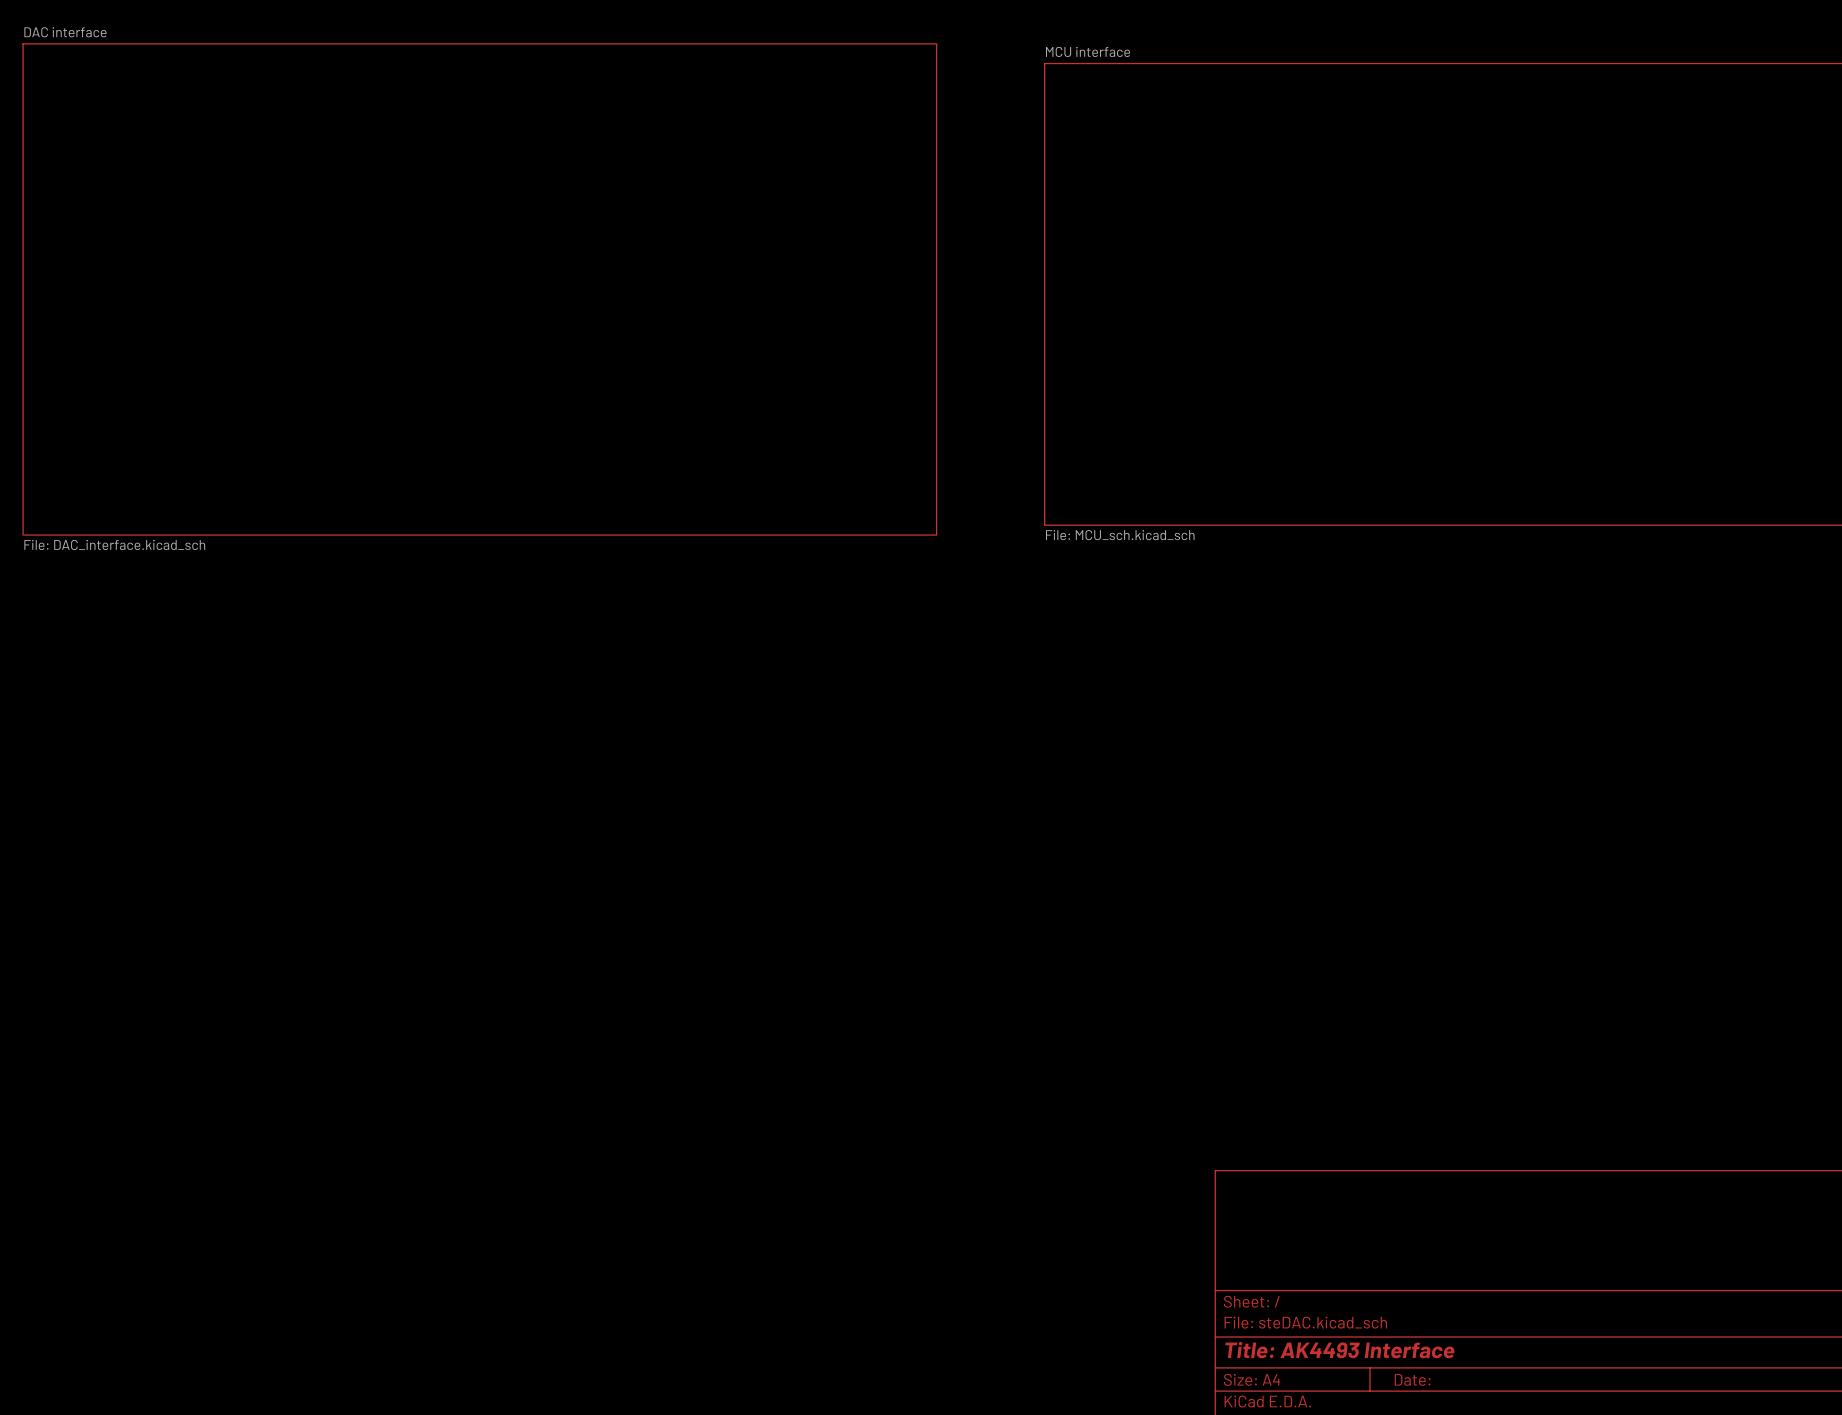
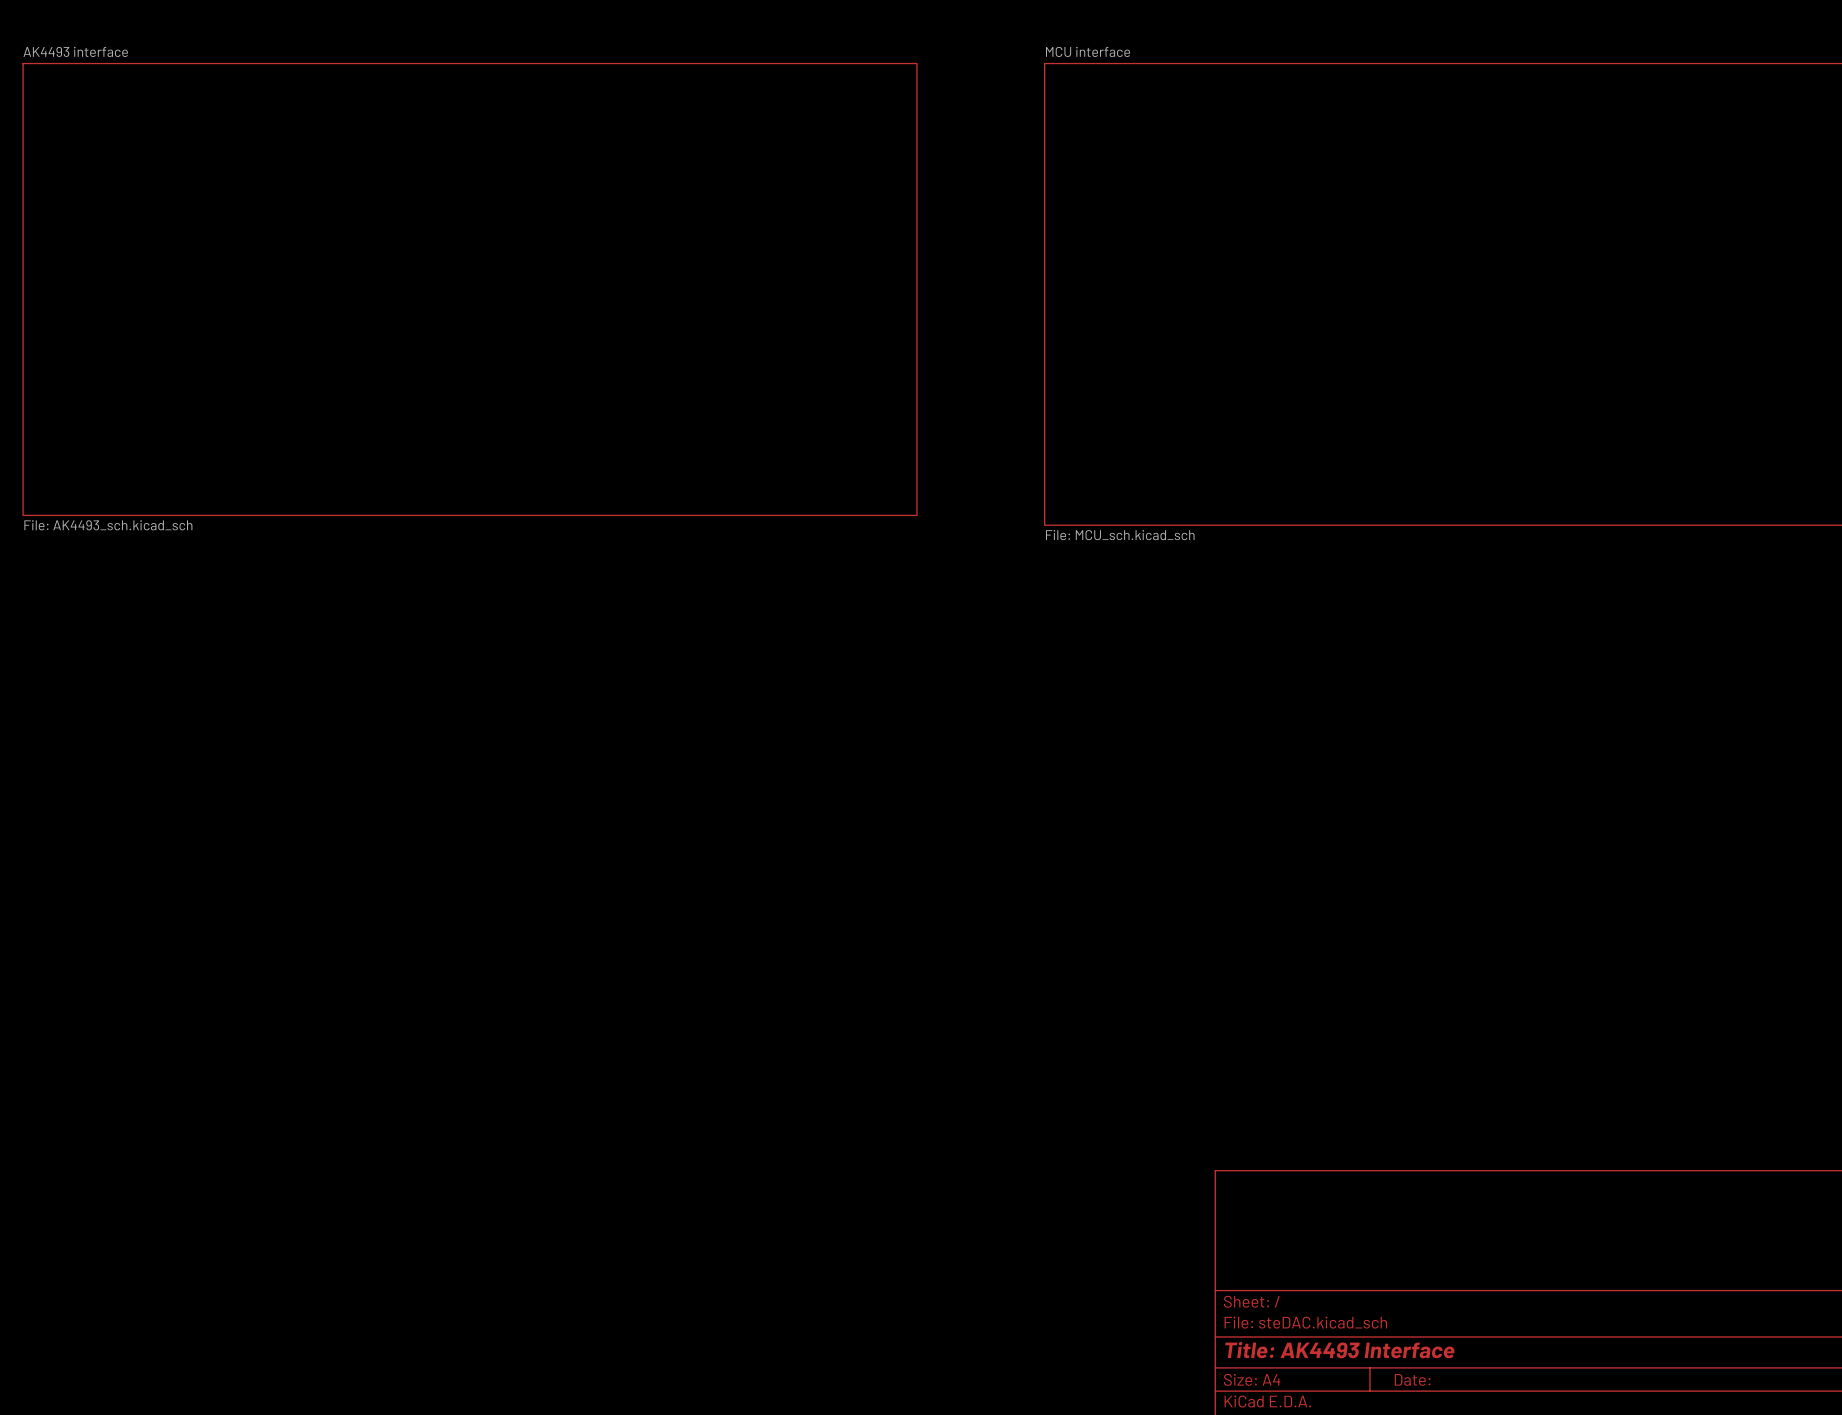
sheet AK4493 interface: none -> File: AK4493_sch.kicad_sch (470, 289)
sheet DAC interface: File: DAC_interface.kicad_sch (479, 289) -> none

